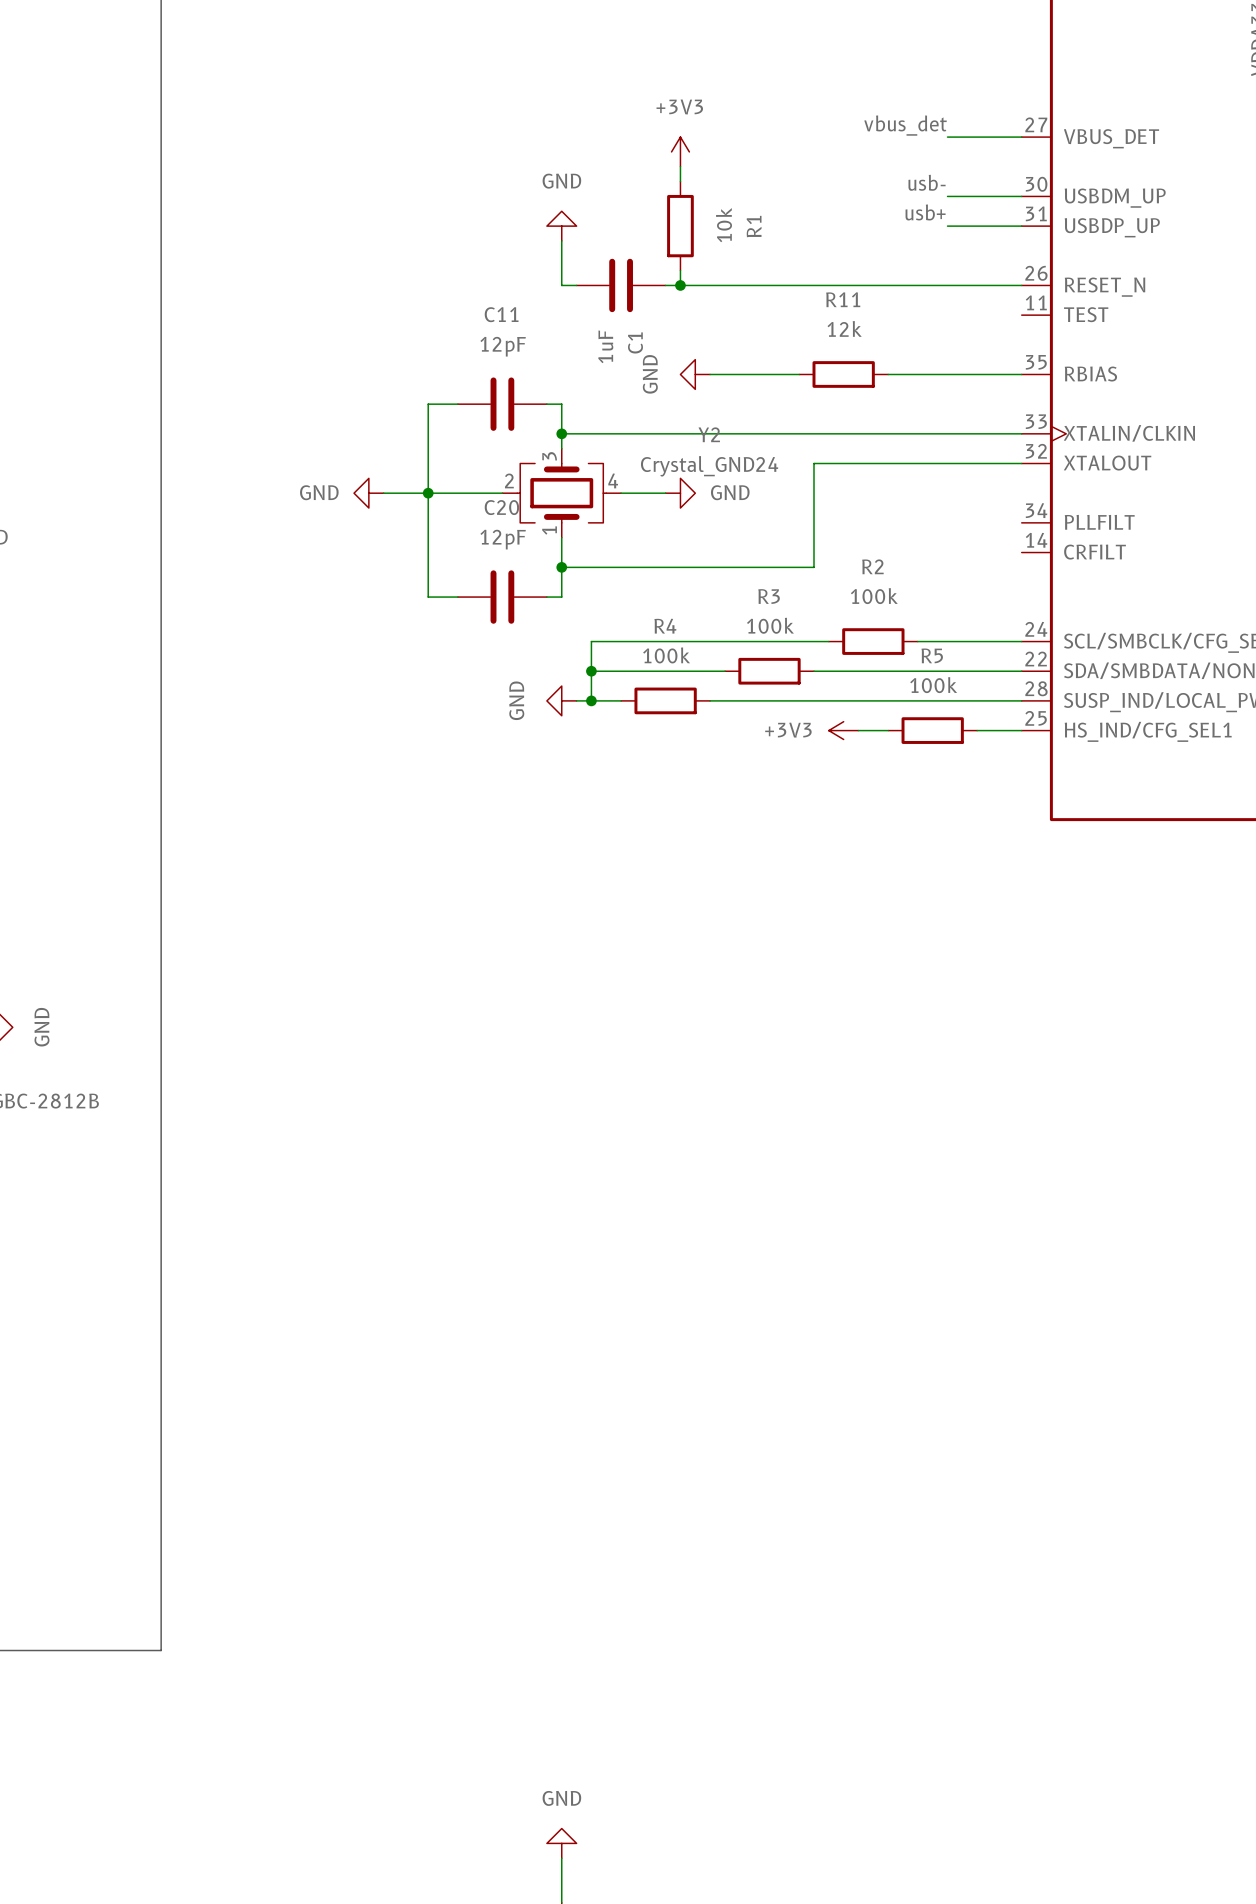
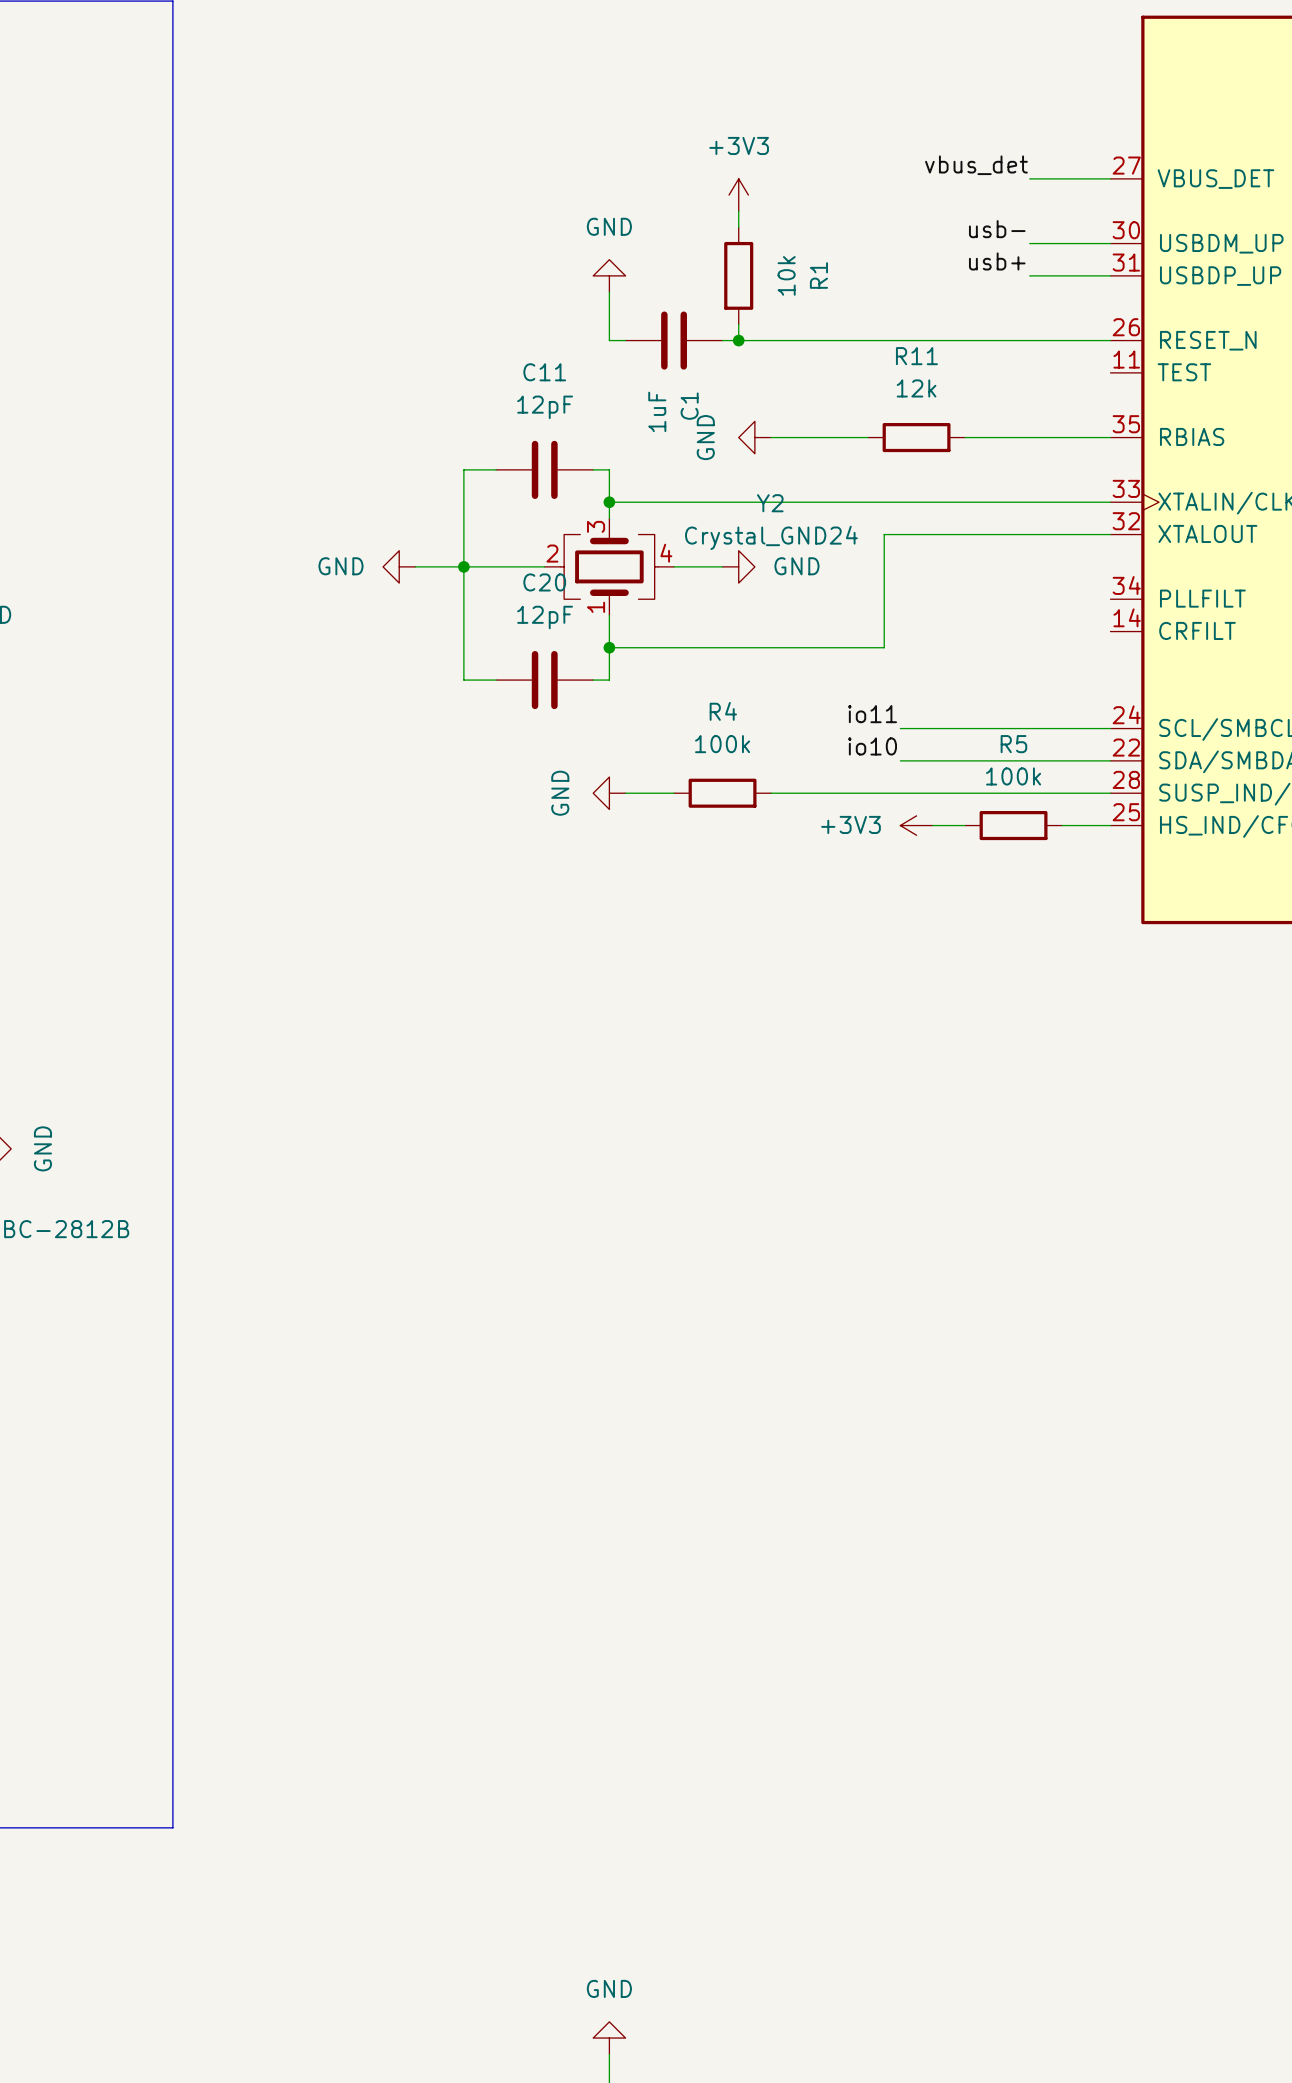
label: none -> io11 (872, 714)
wire: (828, 641) (591, 641) (591, 700) -> (900, 728) (997, 728)
R2: 100k (873, 641) -> none
label: none -> io10 (872, 746)
wire: (591, 671) (724, 671) -> none
junction: (591, 671) -> none
R3: 100k (769, 671) -> none
wire: (813, 671) (828, 671) -> none
junction: (591, 700) -> none

